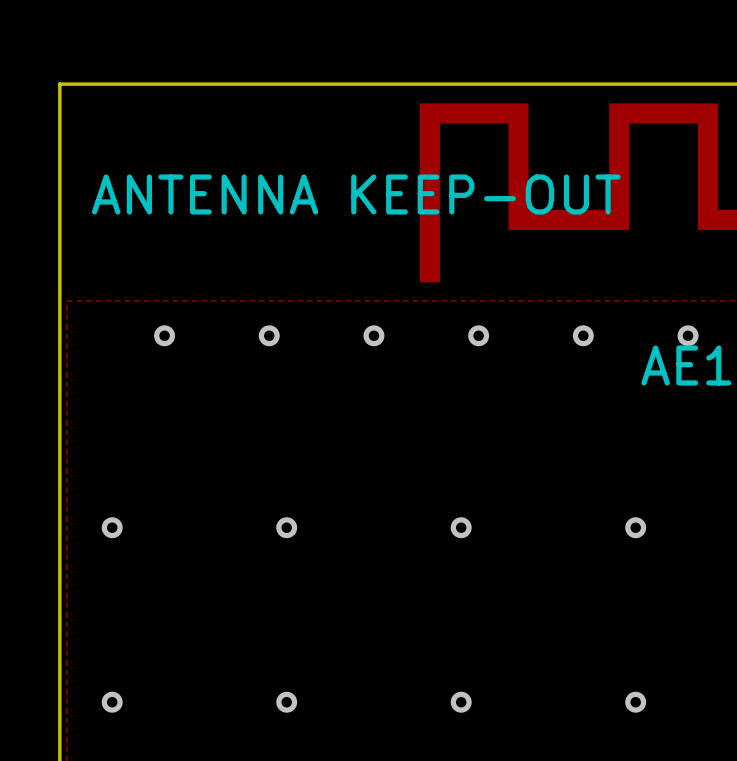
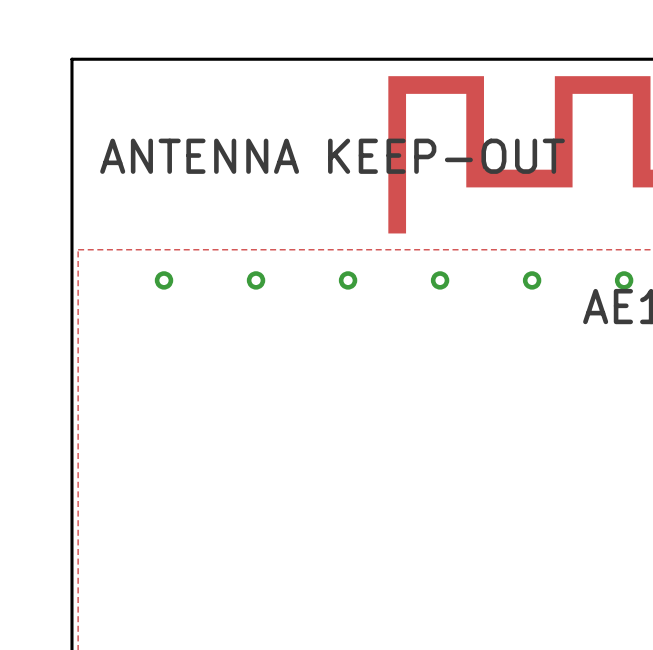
via: (112, 527) -> none
via: (286, 527) -> none
via: (461, 527) -> none
via: (635, 527) -> none
via: (112, 702) -> none
via: (286, 702) -> none
via: (461, 702) -> none
via: (635, 702) -> none

